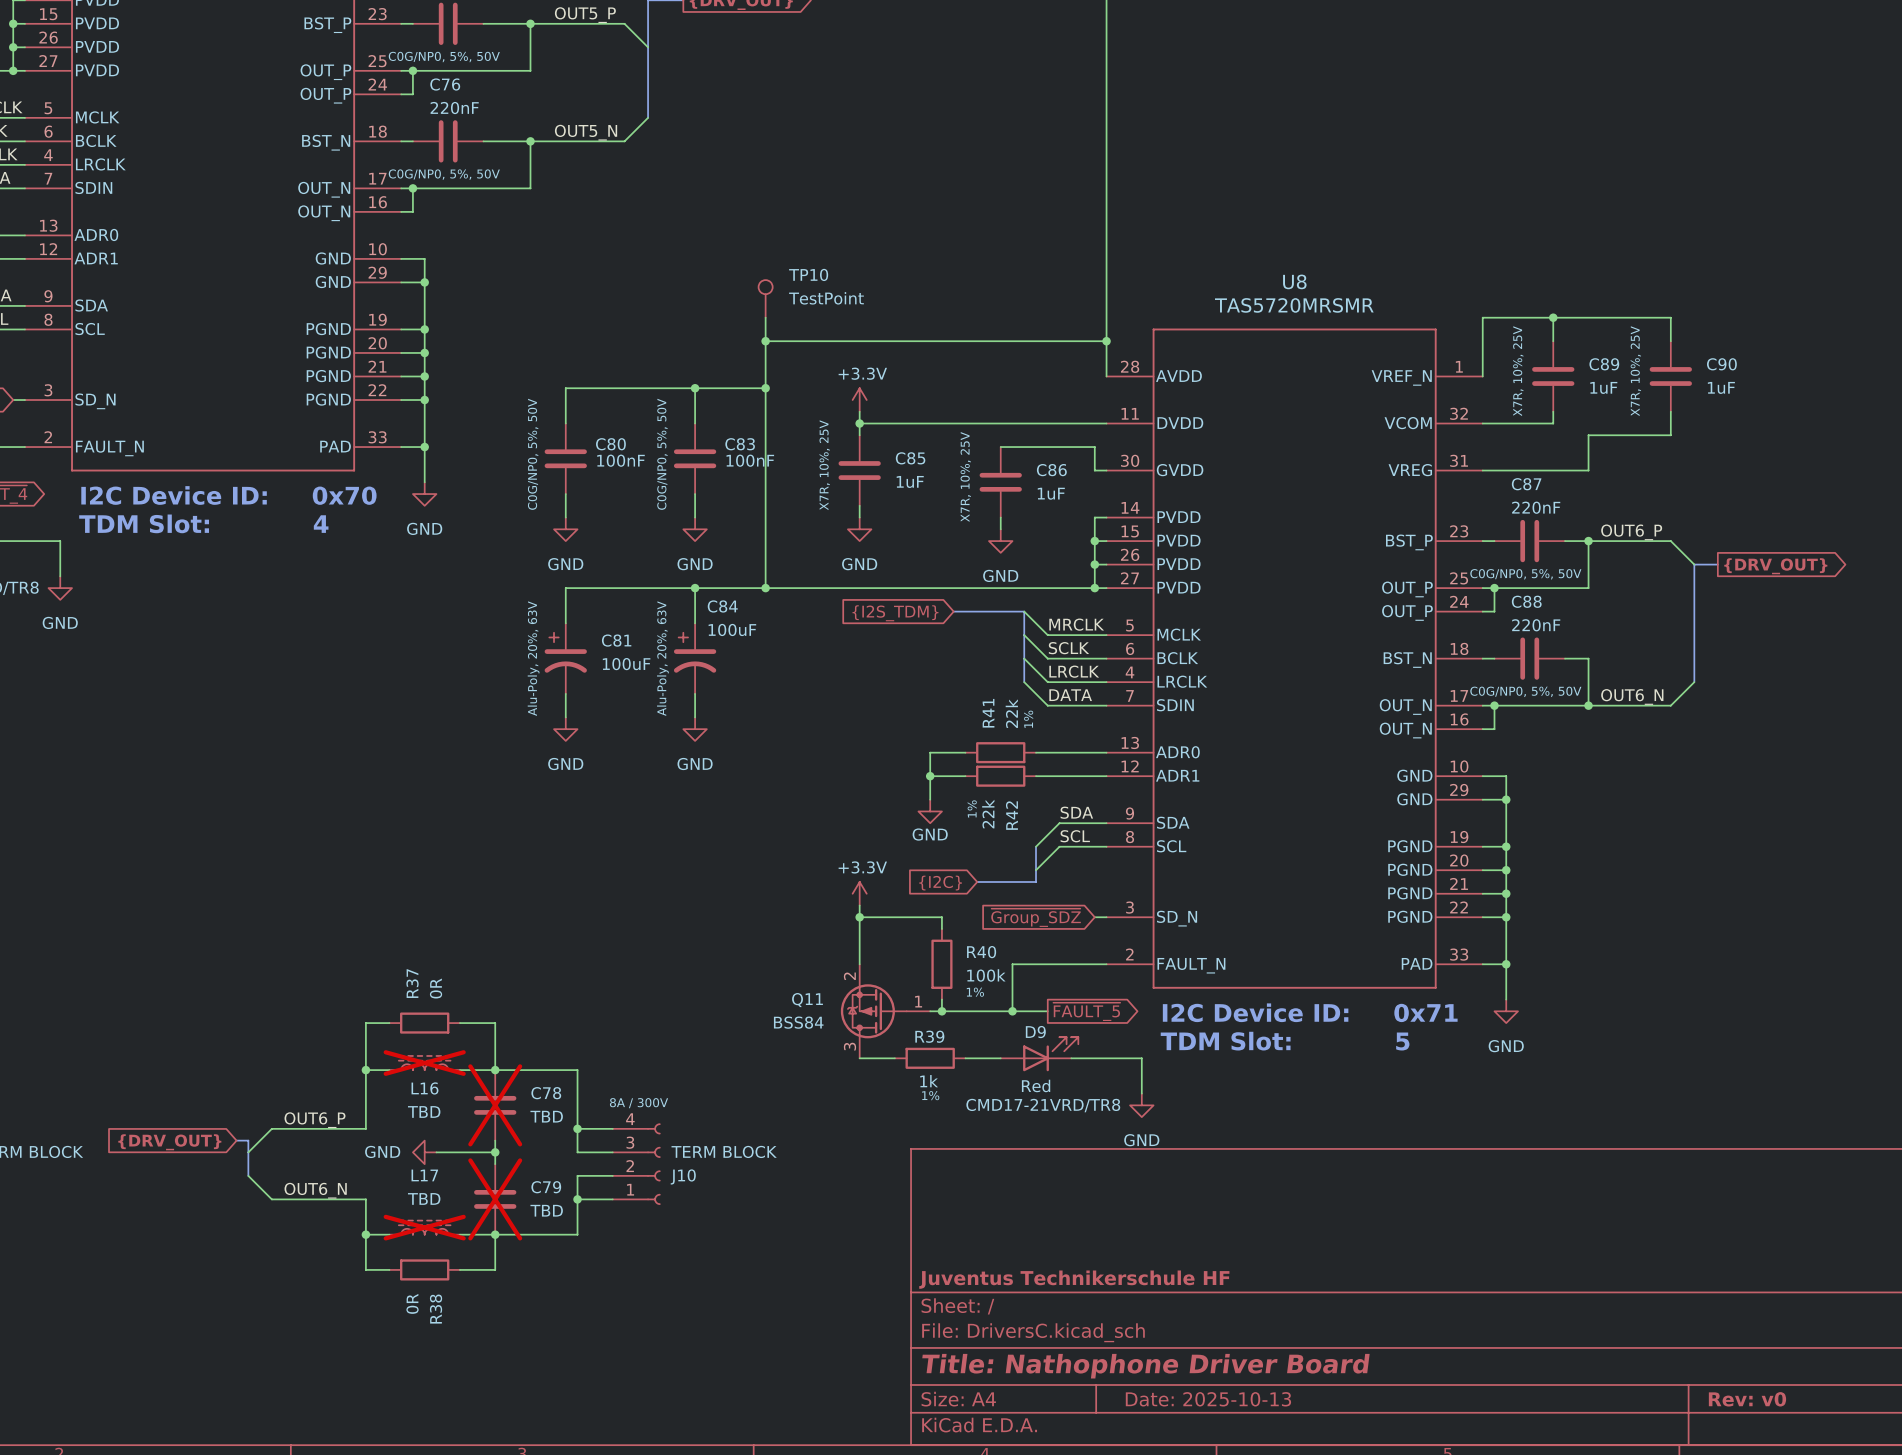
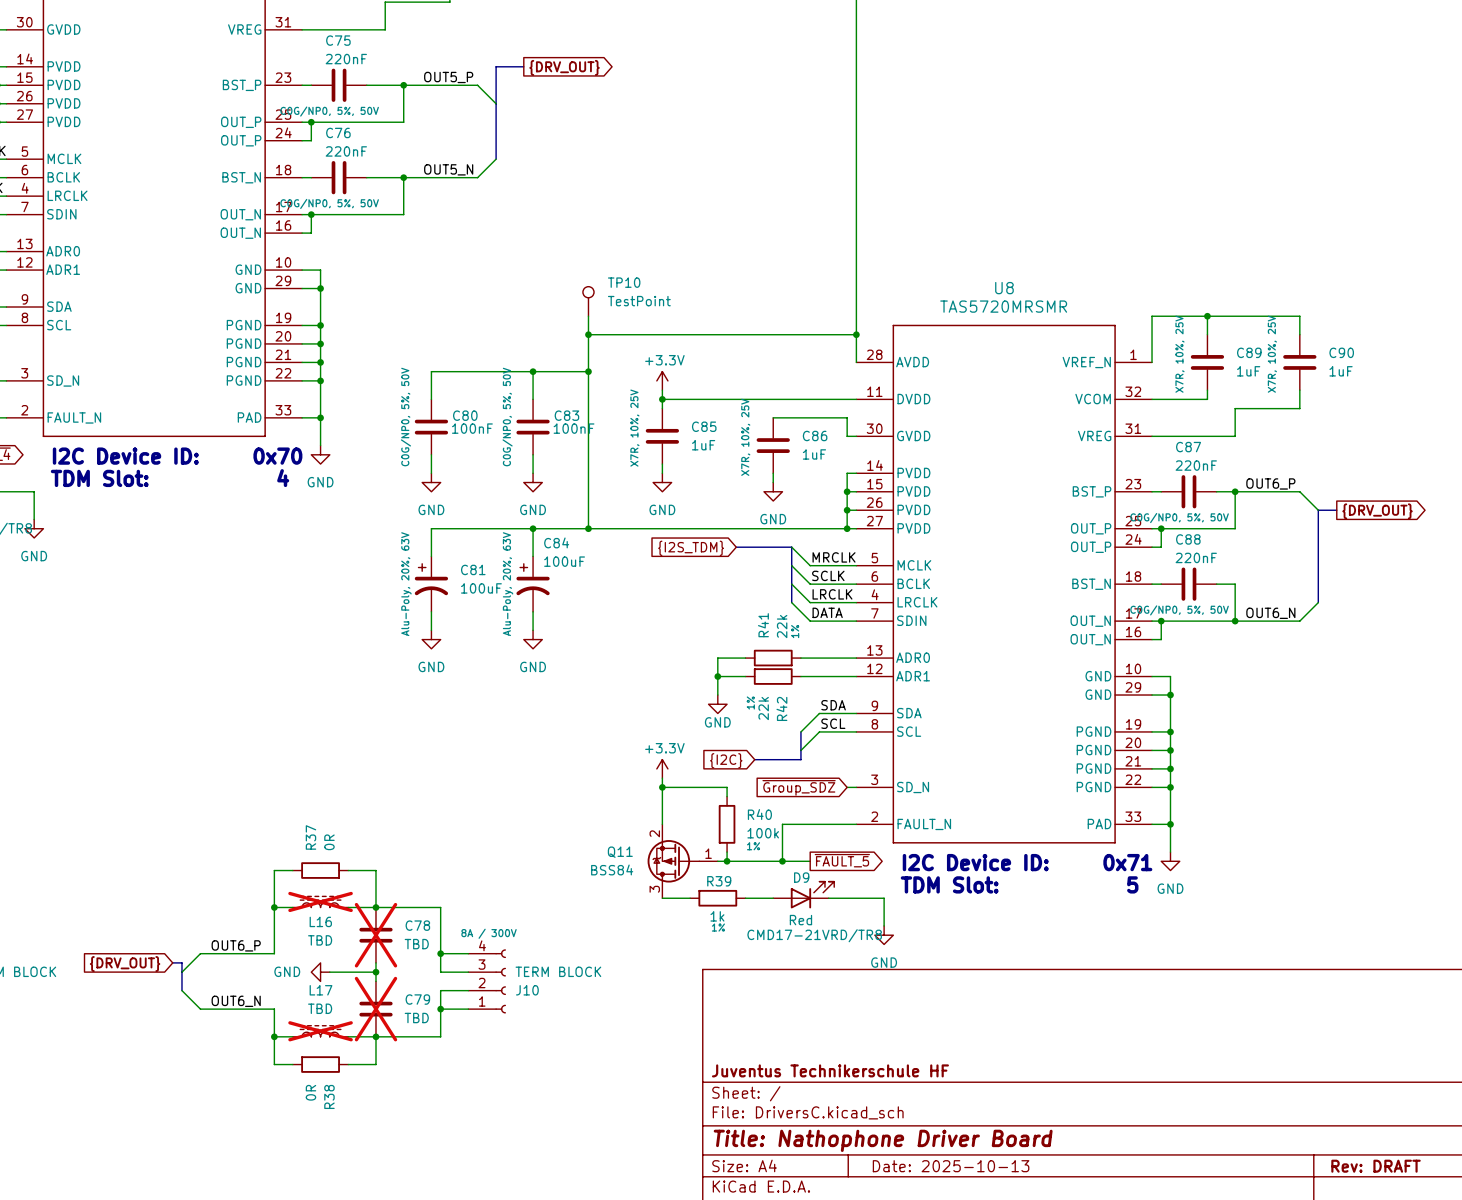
title block: Rev: v0 (1747, 1399) -> Rev: DRAFT (1376, 1166)

